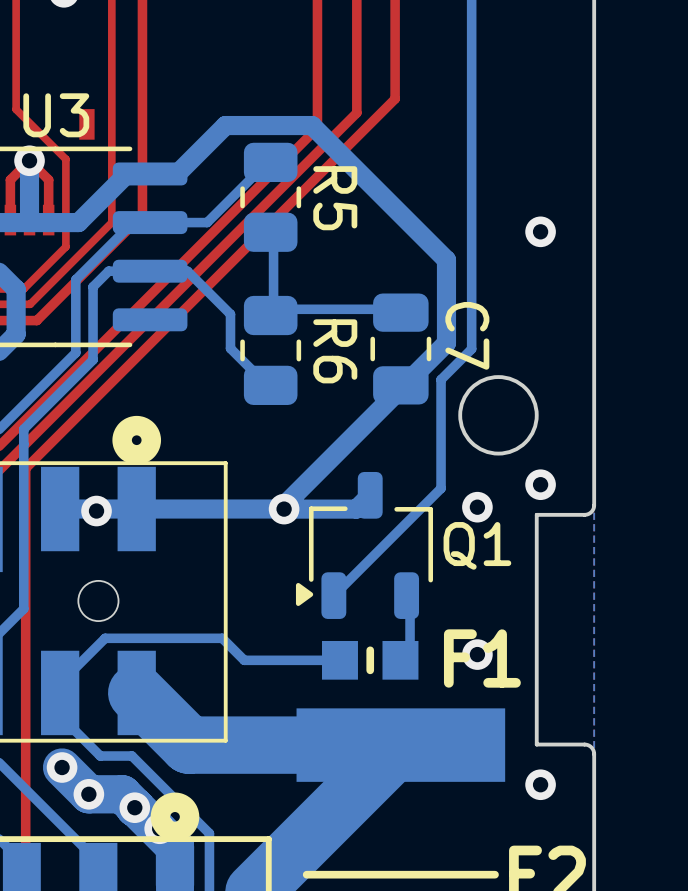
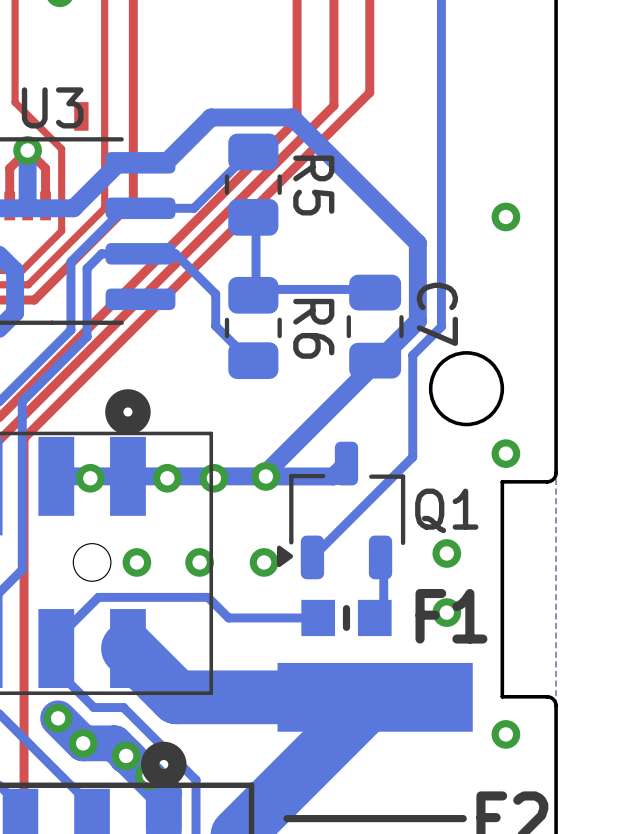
via position: (477, 507) -> (446, 553)
via: none -> (167, 478)
via: none -> (213, 478)
via: none -> (136, 562)
via: none -> (199, 562)
via: none -> (264, 562)

